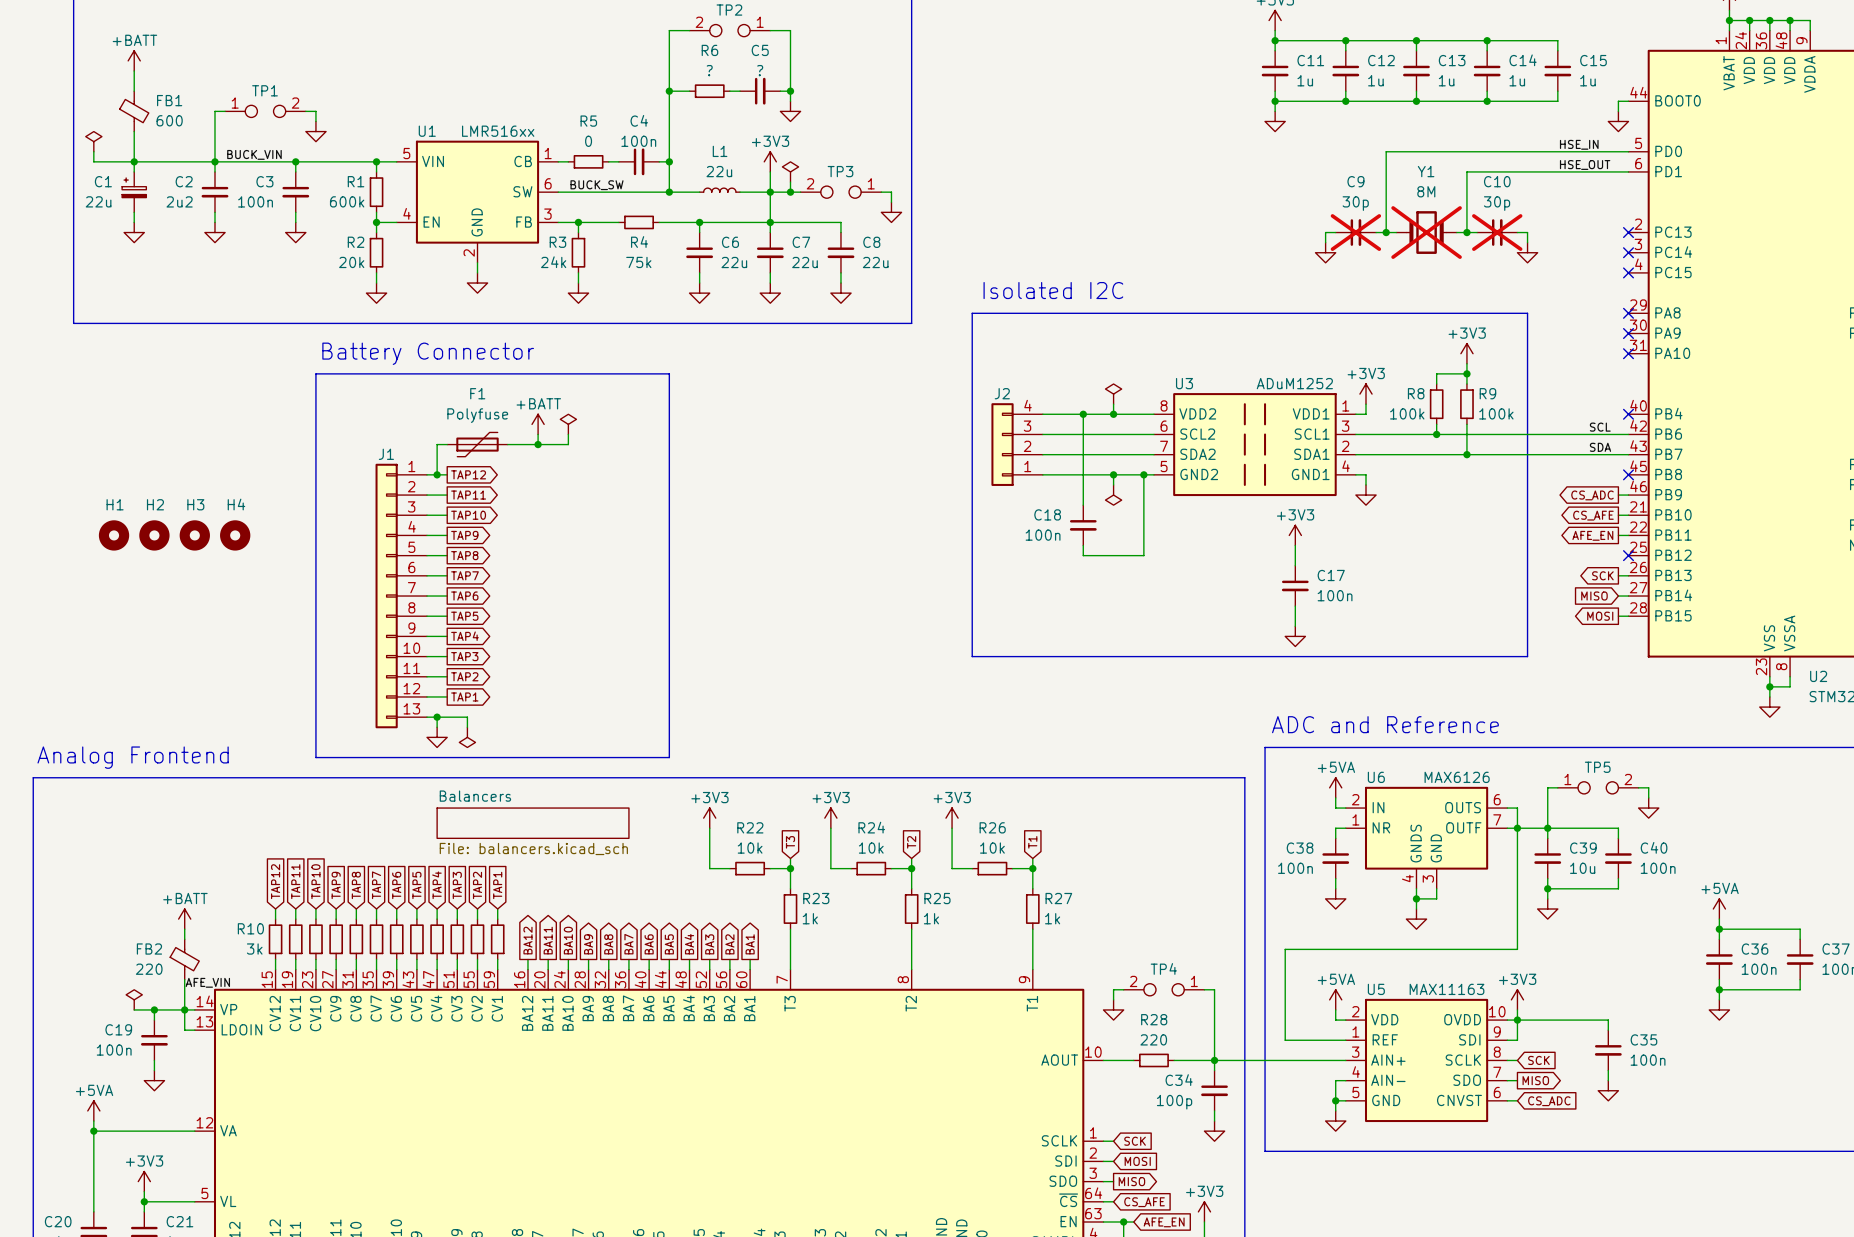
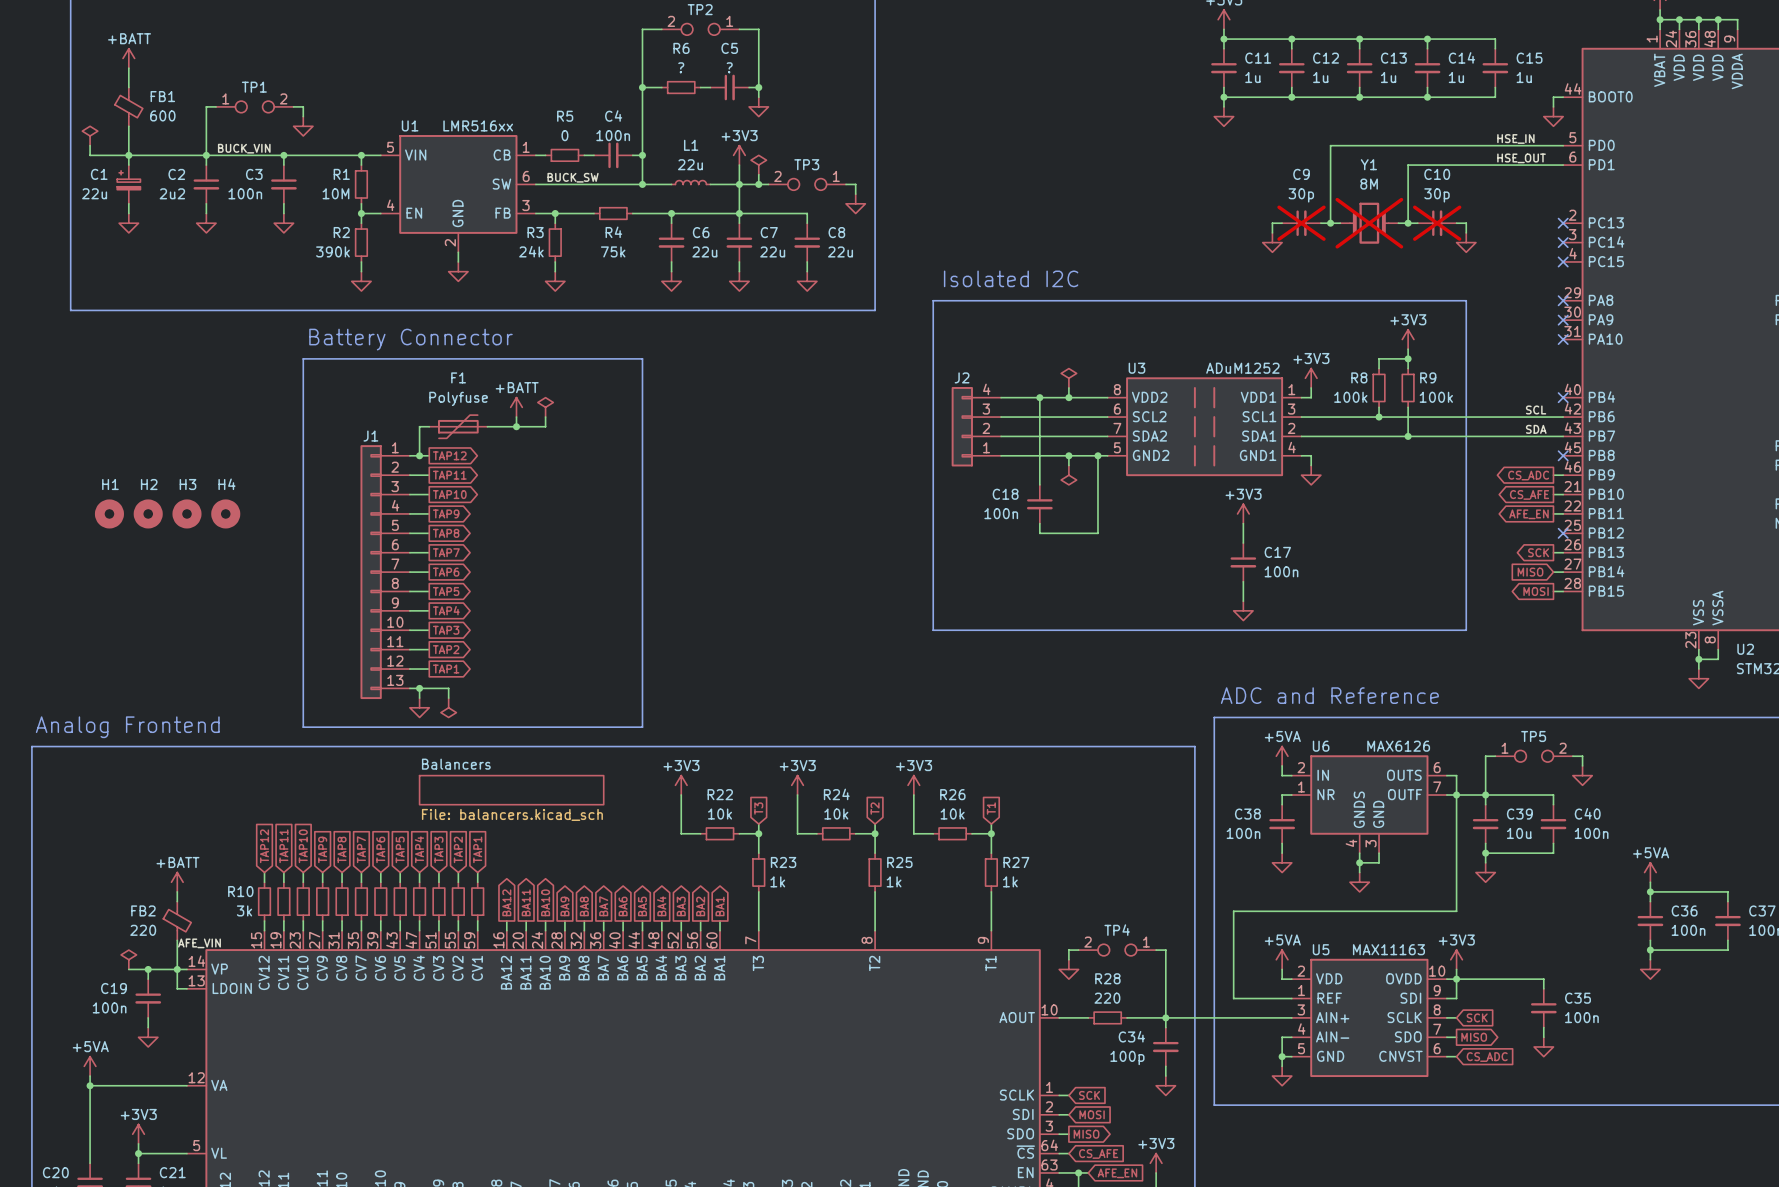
R1 value: 600k (347, 201) -> 10M (335, 193)
R2 value: 20k (351, 262) -> 390k (332, 251)

